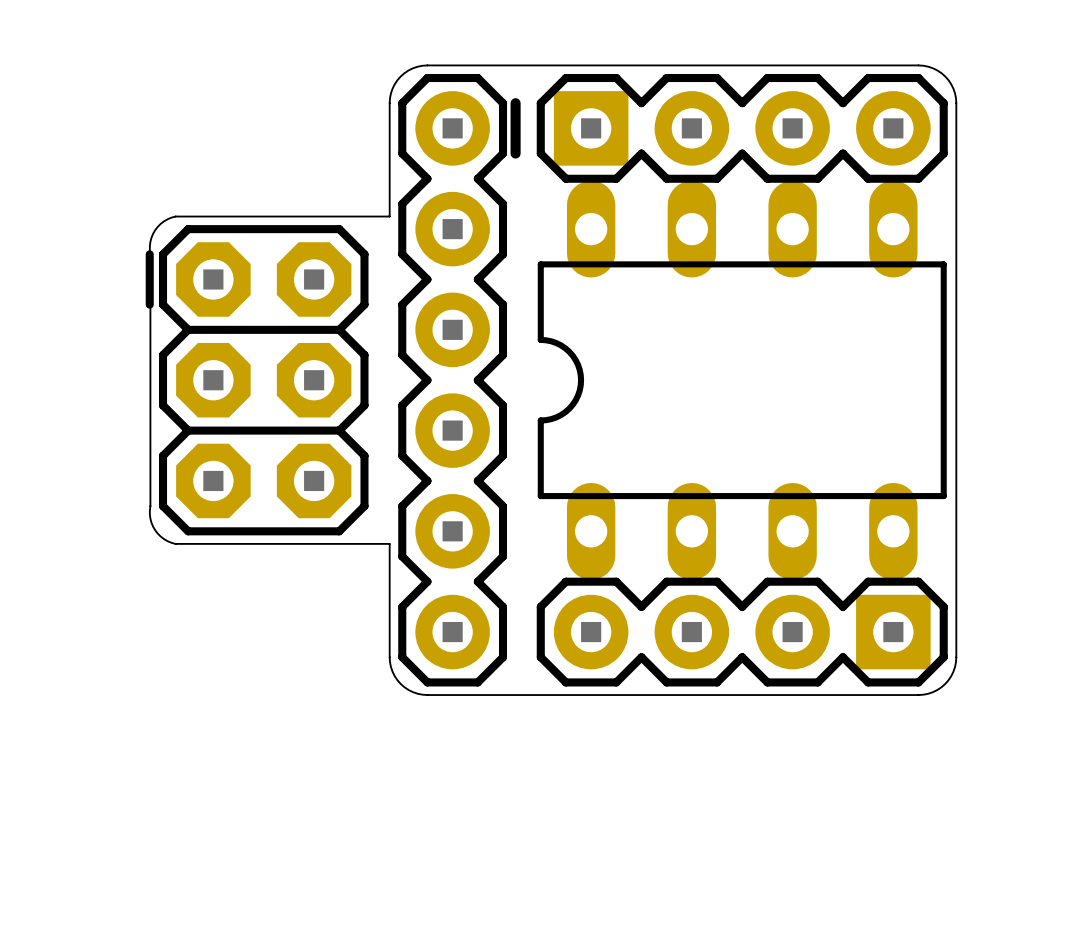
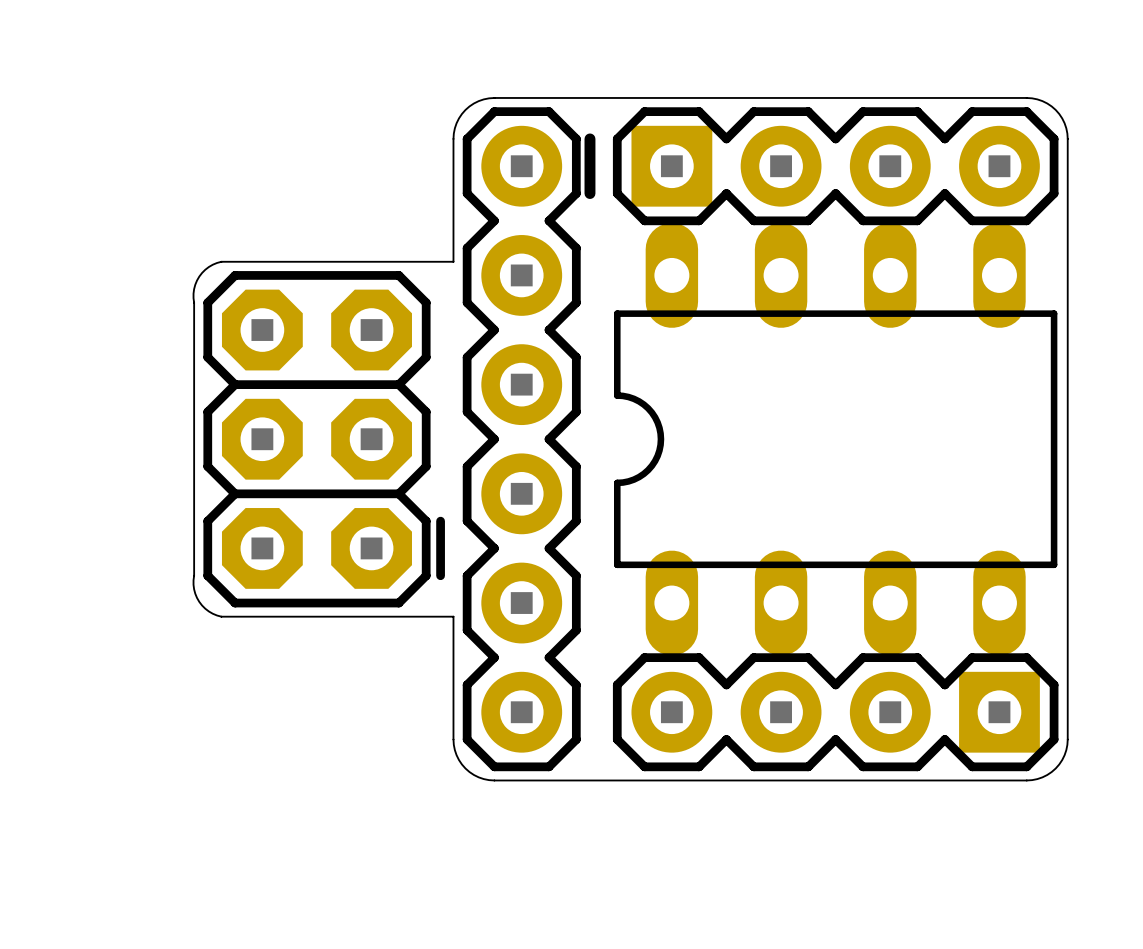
part rotation: 0° (257, 380) -> 180° (324, 439)

